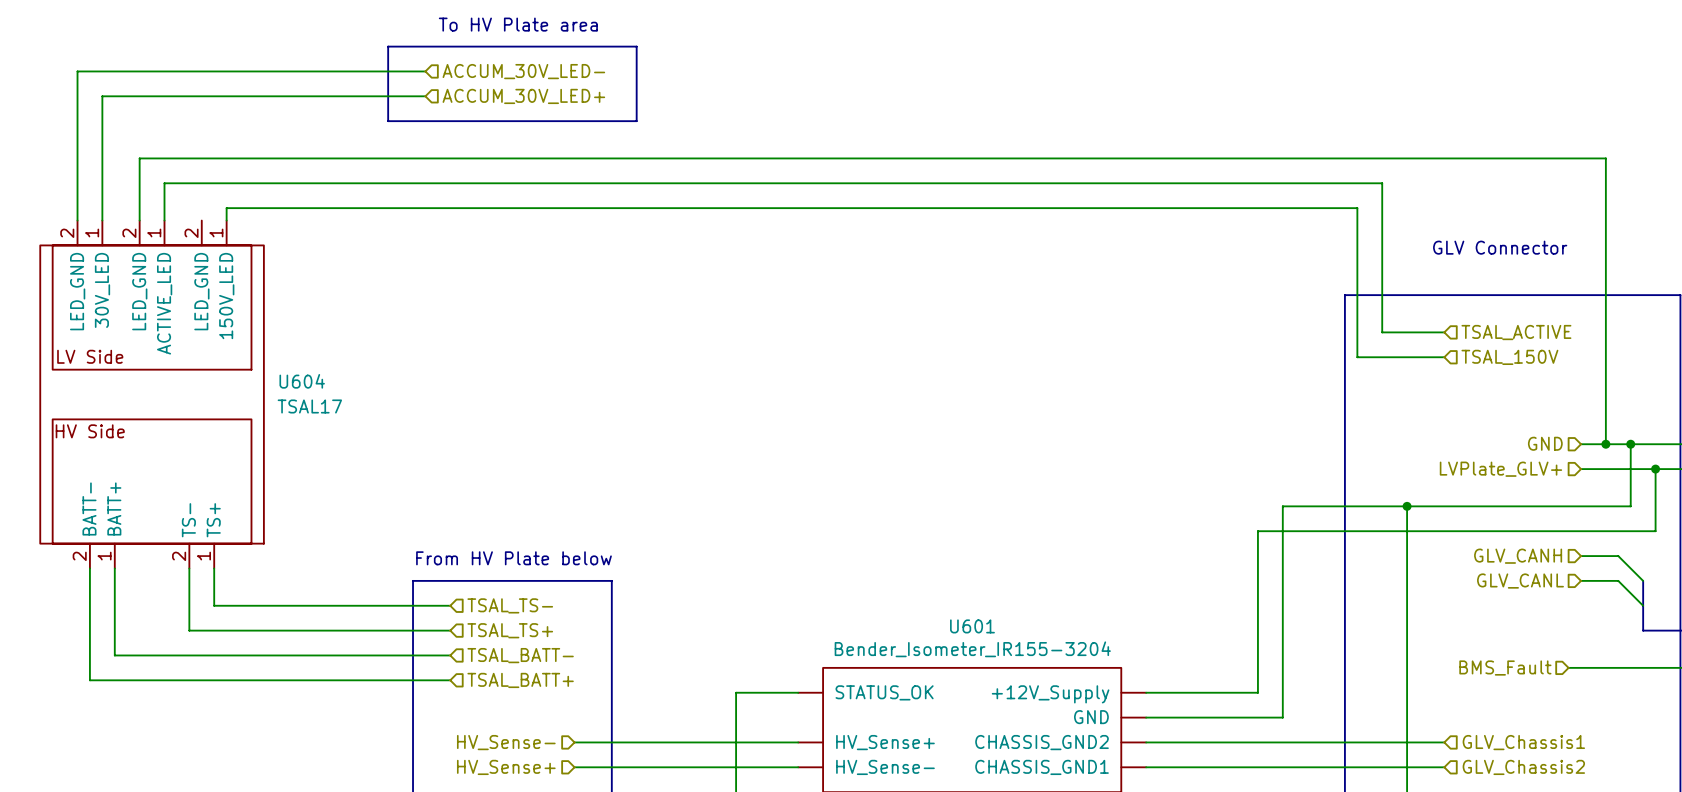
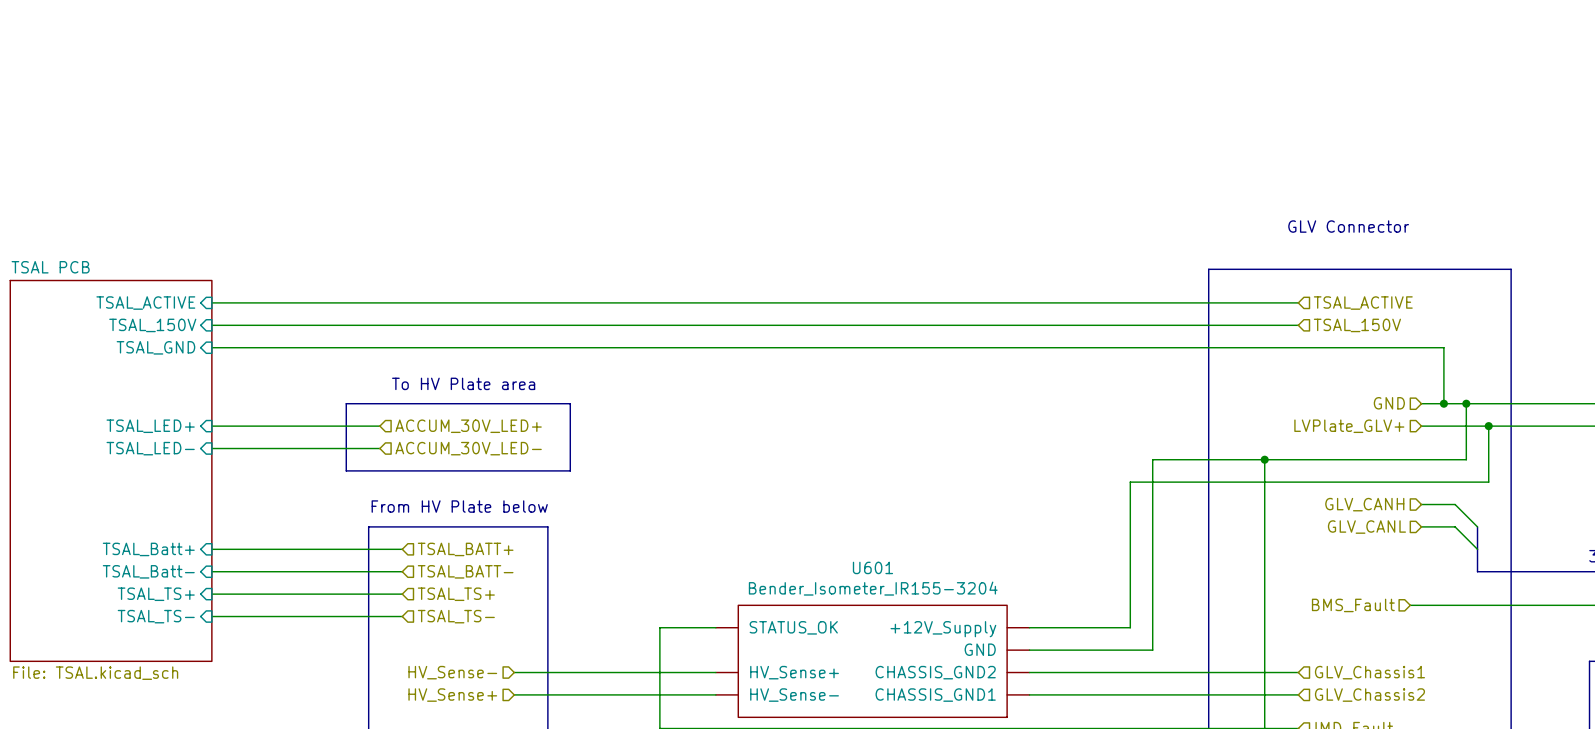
text: To HV Plate area (518, 24) -> none
line: (388, 46) (388, 121) (636, 121) (636, 46) (388, 46) -> none
wire: (425, 71) (77, 71) (77, 220) -> none
hierarchical label: ACCUM_30V_LED- (523, 71) -> none
wire: (425, 96) (102, 96) (102, 220) -> none
hierarchical label: ACCUM_30V_LED+ (523, 96) -> none
wire: (139, 220) (139, 158) (1605, 158) (1605, 382) -> (211, 347) (1443, 347)
wire: (164, 220) (164, 183) (1382, 183) (1382, 332) -> (211, 302) (1242, 302)
wire: (226, 220) (226, 208) (1357, 208) (1357, 357) -> (211, 325) (1219, 325)
sheet pin: none -> TSAL_ACTIVE (145, 303)
sheet pin: none -> TSAL_150V (152, 325)
sheet pin: none -> TSAL_GND (155, 347)
U604: TSAL17 (152, 394) -> none
text: none -> To HV Plate area (463, 383)
line: none -> (346, 403) (346, 470) (570, 470) (570, 403) (346, 403)
sheet pin: none -> TSAL_LED+ (150, 426)
wire: none -> (211, 426) (379, 426)
hierarchical label: none -> ACCUM_30V_LED+ (468, 426)
wire: none -> (211, 448) (379, 448)
sheet pin: none -> TSAL_LED- (150, 448)
hierarchical label: none -> ACCUM_30V_LED- (468, 448)
sheet TSAL PCB: none -> File: TSAL.kicad_sch (111, 470)
wire: (89, 568) (89, 680) (239, 680) -> none
wire: (114, 568) (114, 655) (239, 655) -> none
wire: (189, 568) (189, 630) (239, 630) -> none
wire: (214, 568) (214, 605) (239, 605) -> none
sheet pin: none -> TSAL_Batt+ (148, 549)
hierarchical label: TSAL_TS- (510, 605) -> TSAL_BATT+ (465, 549)
sheet pin: none -> TSAL_Batt- (148, 571)
hierarchical label: TSAL_TS+ (510, 630) -> TSAL_BATT- (465, 571)
sheet pin: none -> TSAL_TS+ (156, 594)
hierarchical label: TSAL_BATT- (520, 655) -> TSAL_TS+ (456, 594)
sheet pin: none -> TSAL_TS- (156, 616)
hierarchical label: TSAL_BATT+ (520, 680) -> TSAL_TS- (456, 616)

